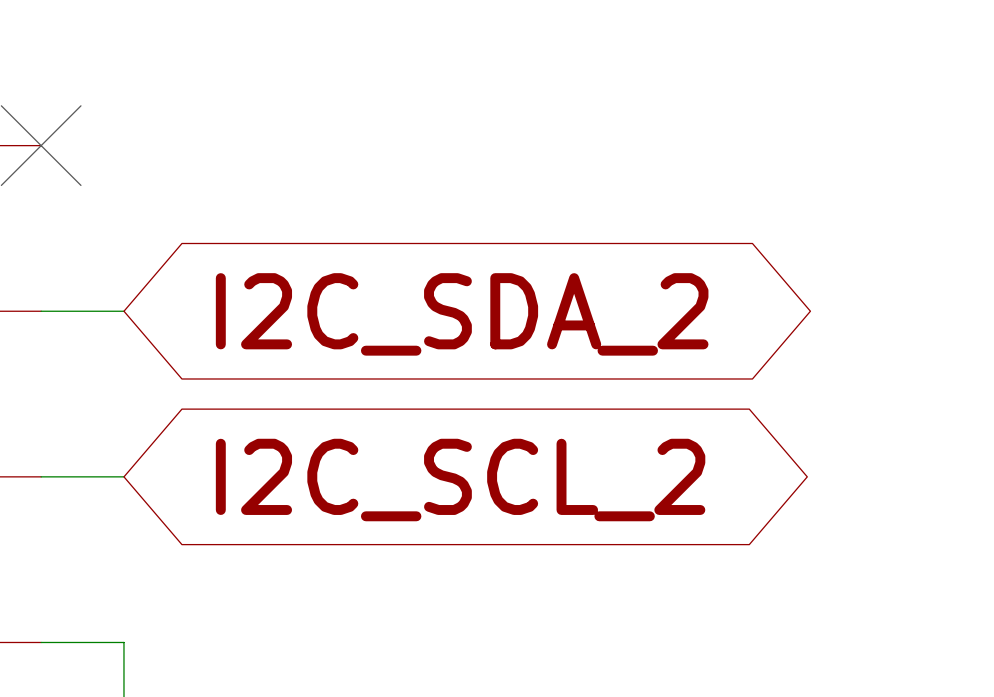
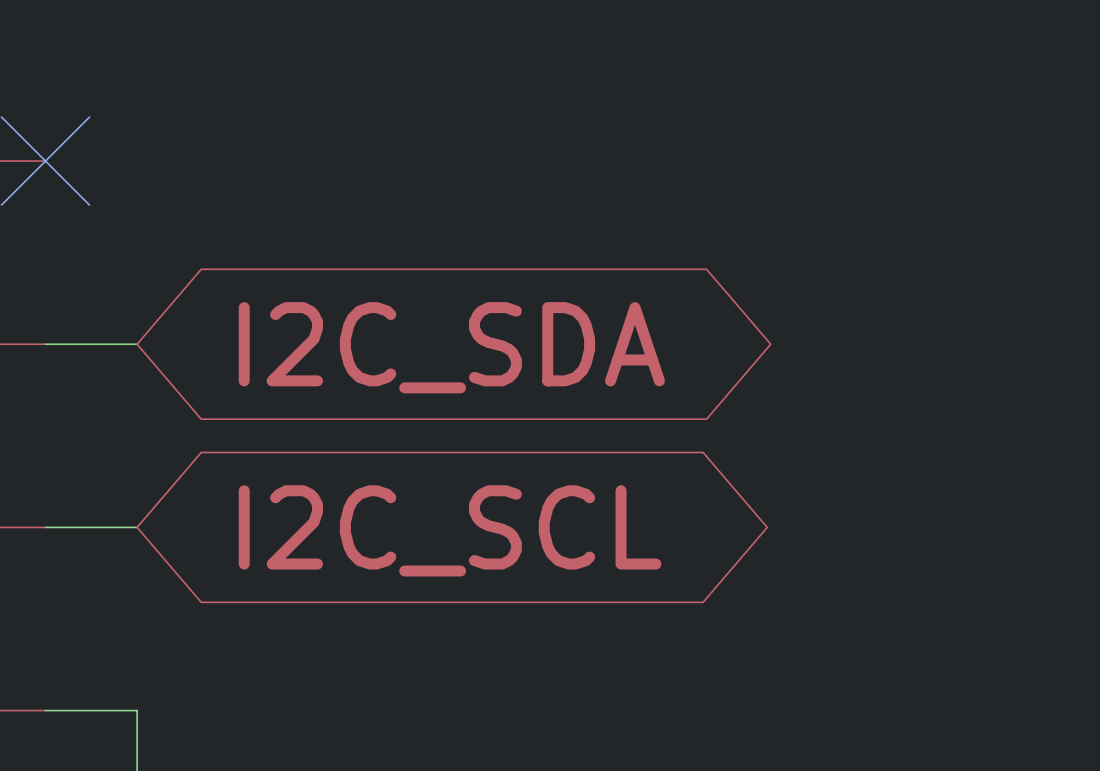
global label: I2C_SDA_2 (462, 314) -> I2C_SDA (451, 347)
global label: I2C_SCL_2 (460, 480) -> I2C_SCL (450, 530)

